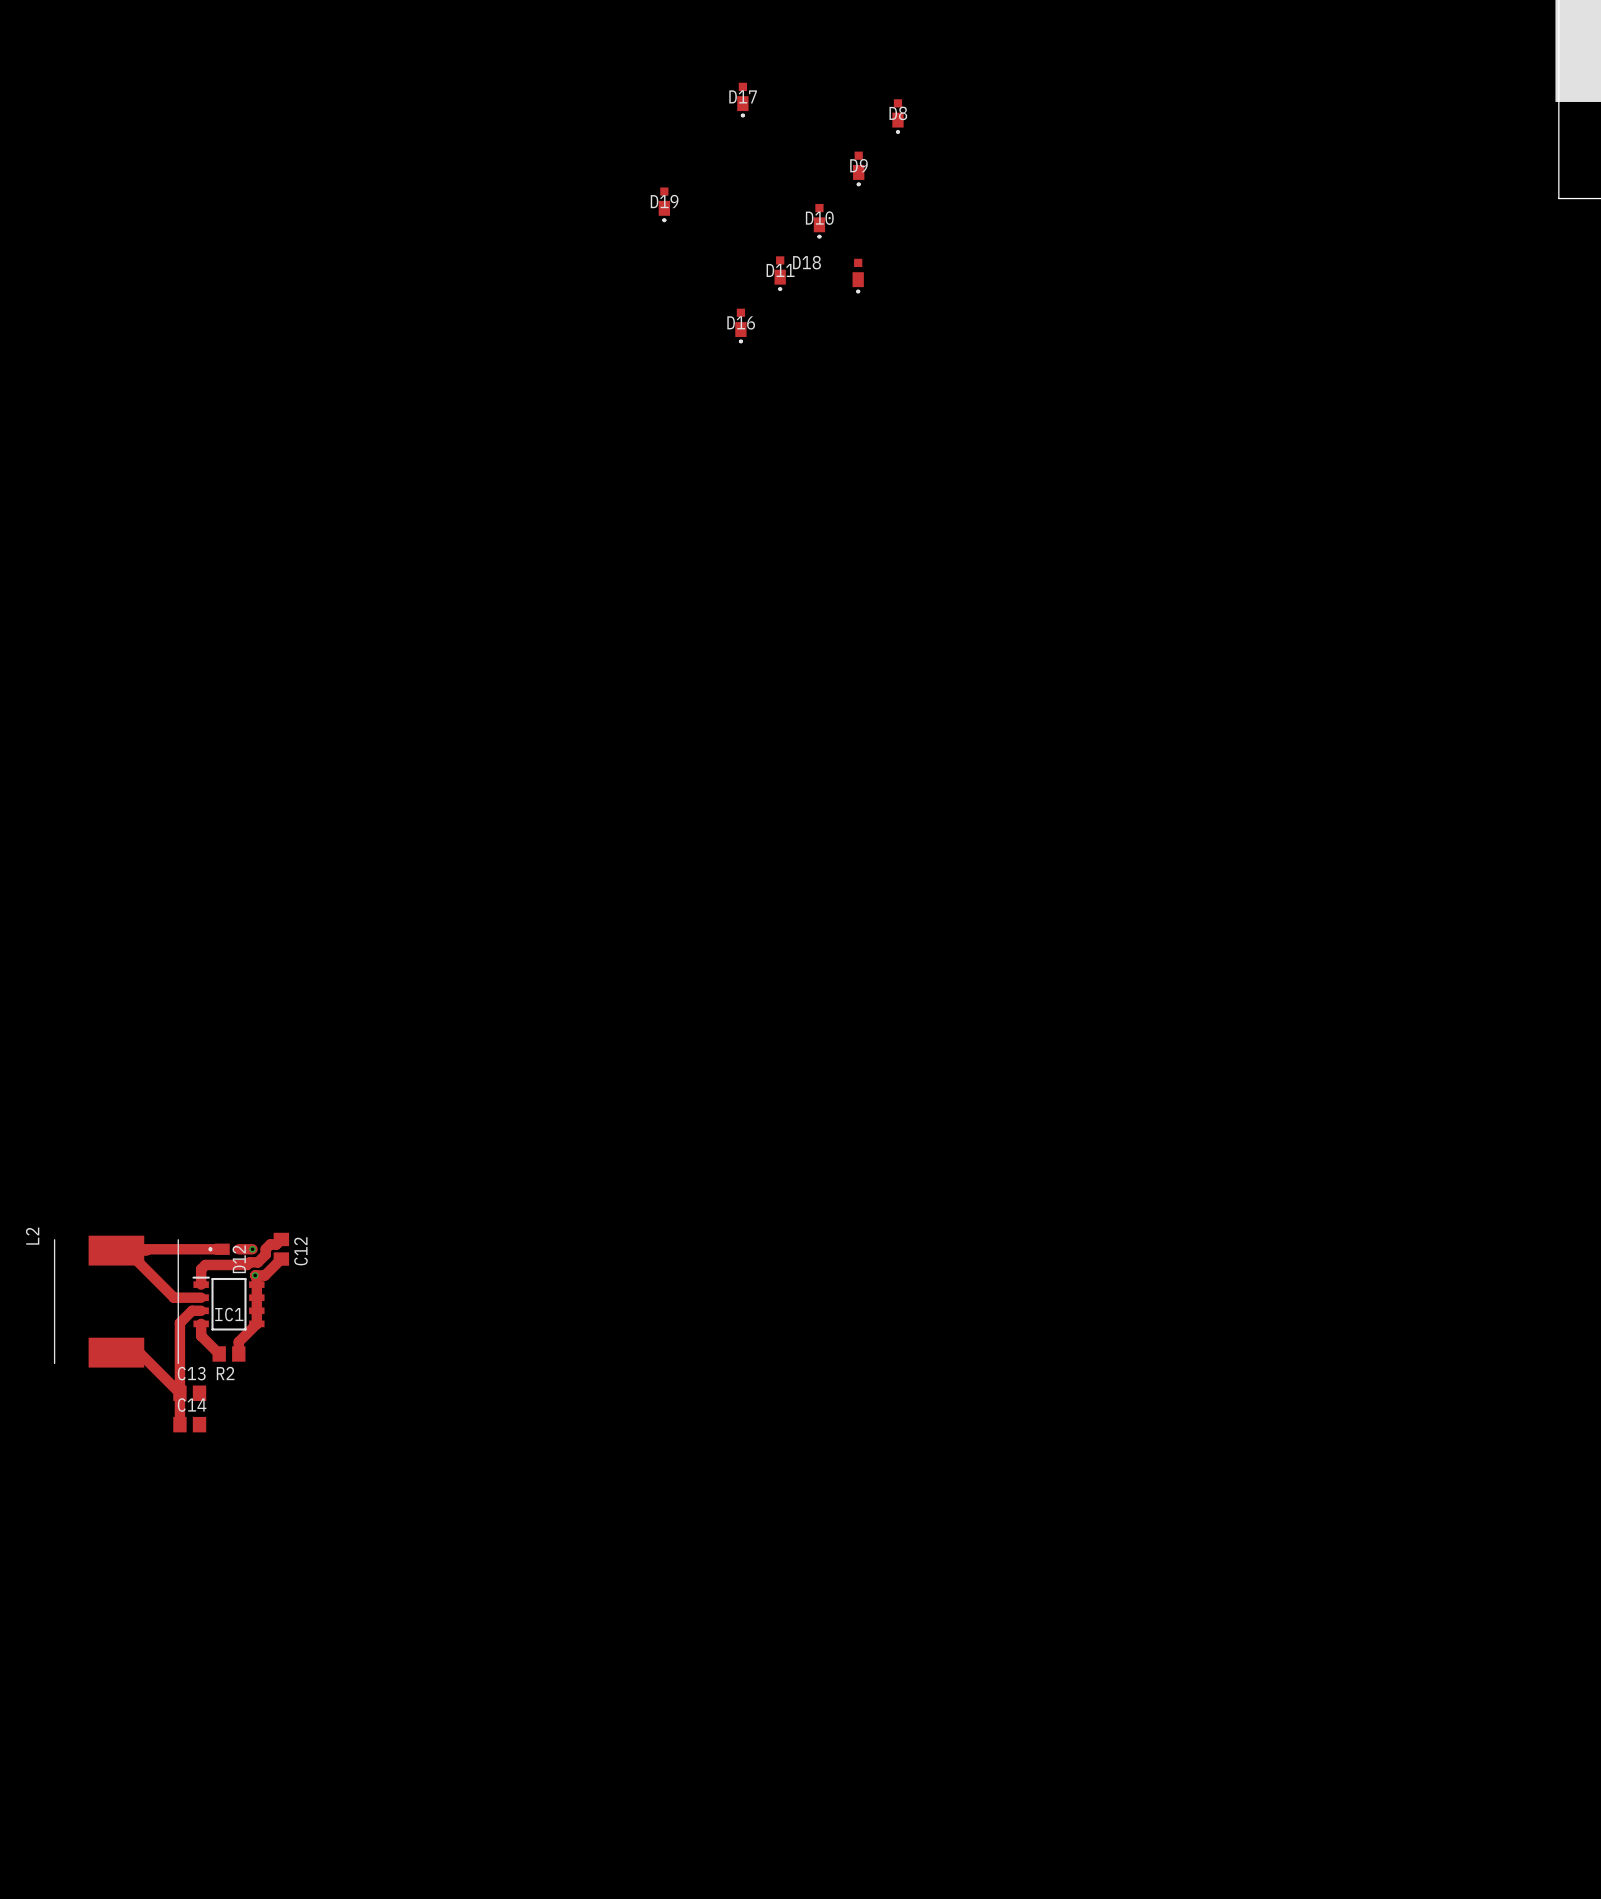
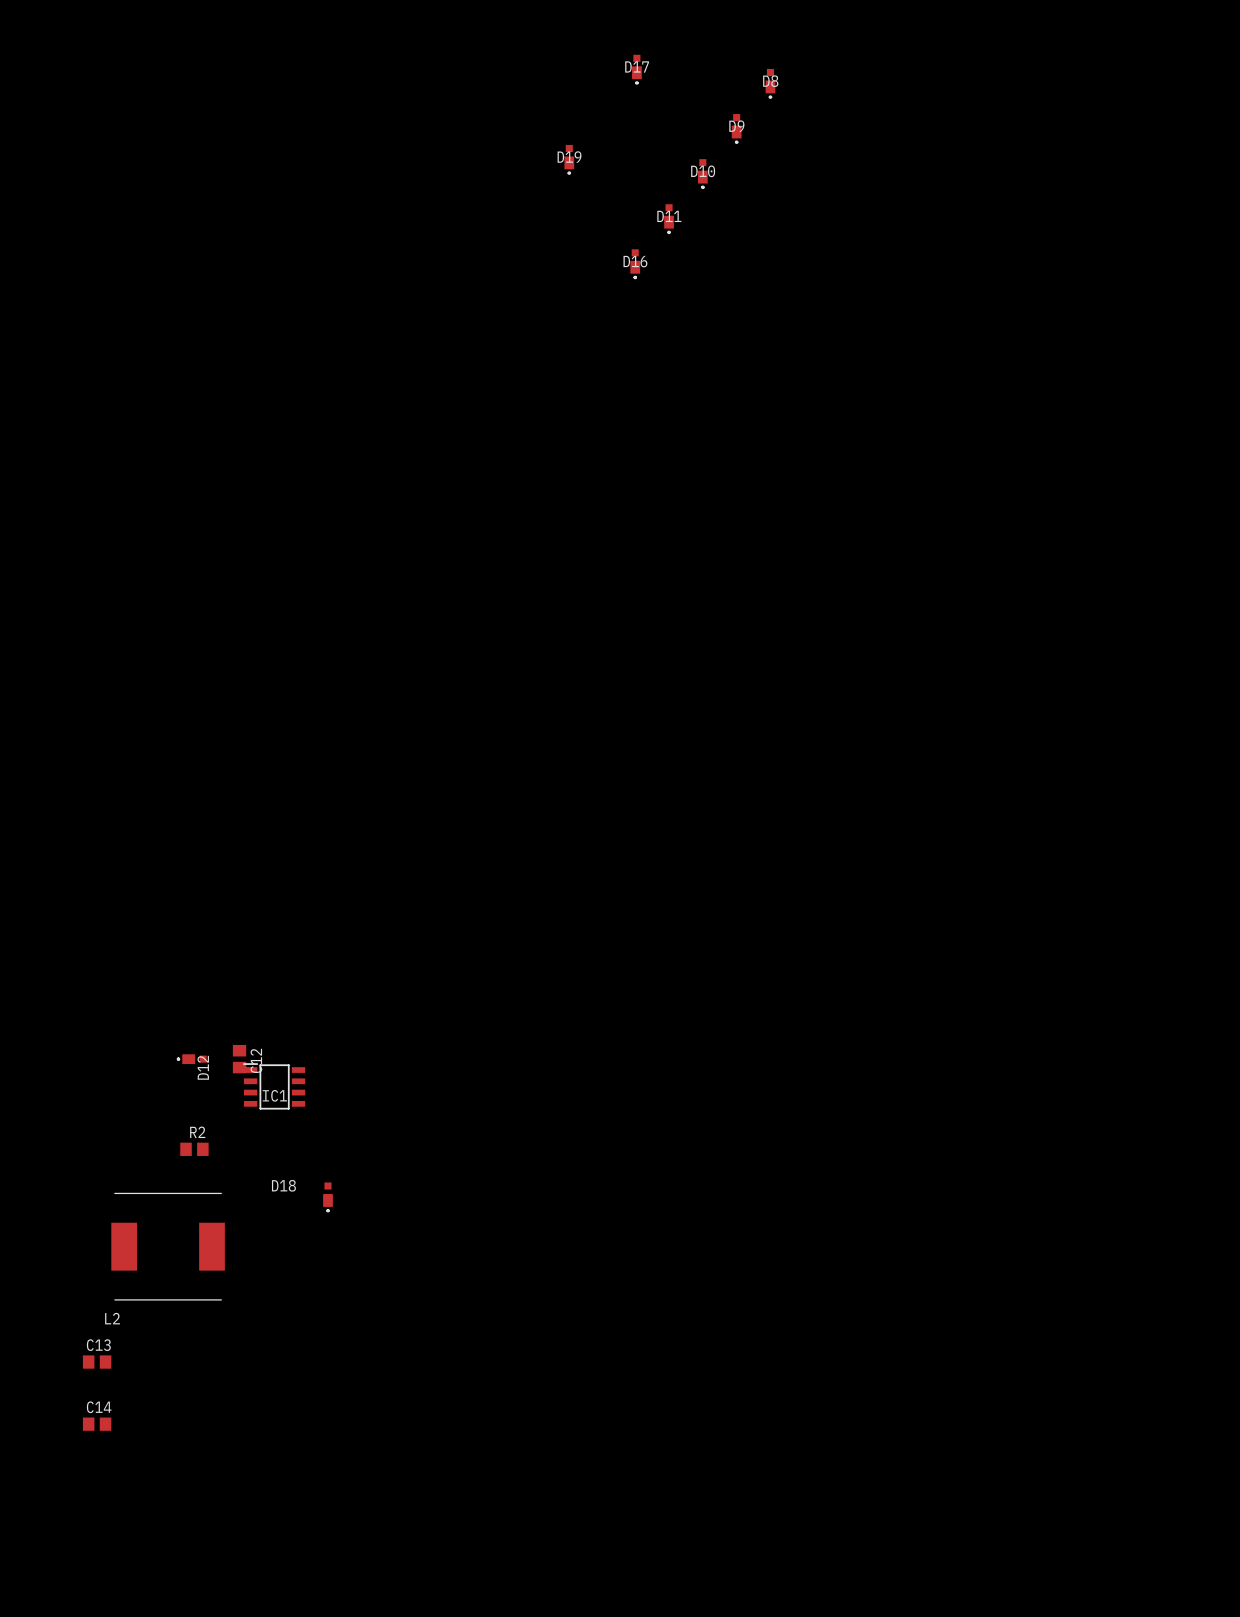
D18 position: (858, 276) -> (328, 1197)
L2 name position: L2 (32, 1236) -> L2 (112, 1318)
track: (281, 1239) (276, 1244) (270, 1244) (265, 1249) (265, 1254) (257, 1262) (249, 1262) (247, 1264) (205, 1264) (201, 1269) (201, 1284) -> none
track: (222, 1249) (116, 1250) (146, 1250) -> none
track: (239, 1249) (252, 1249) -> none
via: (252, 1249) -> none
track: (126, 1250) (173, 1297) (201, 1297) -> none
track: (281, 1259) (264, 1275) (255, 1275) (256, 1277) (256, 1323) (238, 1341) (238, 1353) -> none
via: (255, 1275) -> none
L2 rotation: 0° (116, 1301) -> 90° clockwise (168, 1246)
L2 position: (116, 1301) -> (168, 1246)
IC1 position: (228, 1303) -> (274, 1086)
track: (201, 1310) (192, 1310) (179, 1322) (179, 1424) -> none
track: (201, 1323) (201, 1335) (219, 1353) -> none
track: (116, 1352) (139, 1352) (179, 1393) -> none
R2 name position: R2 (225, 1373) -> R2 (197, 1132)
C13 position: (189, 1393) -> (97, 1362)
C14 position: (189, 1424) -> (97, 1424)

